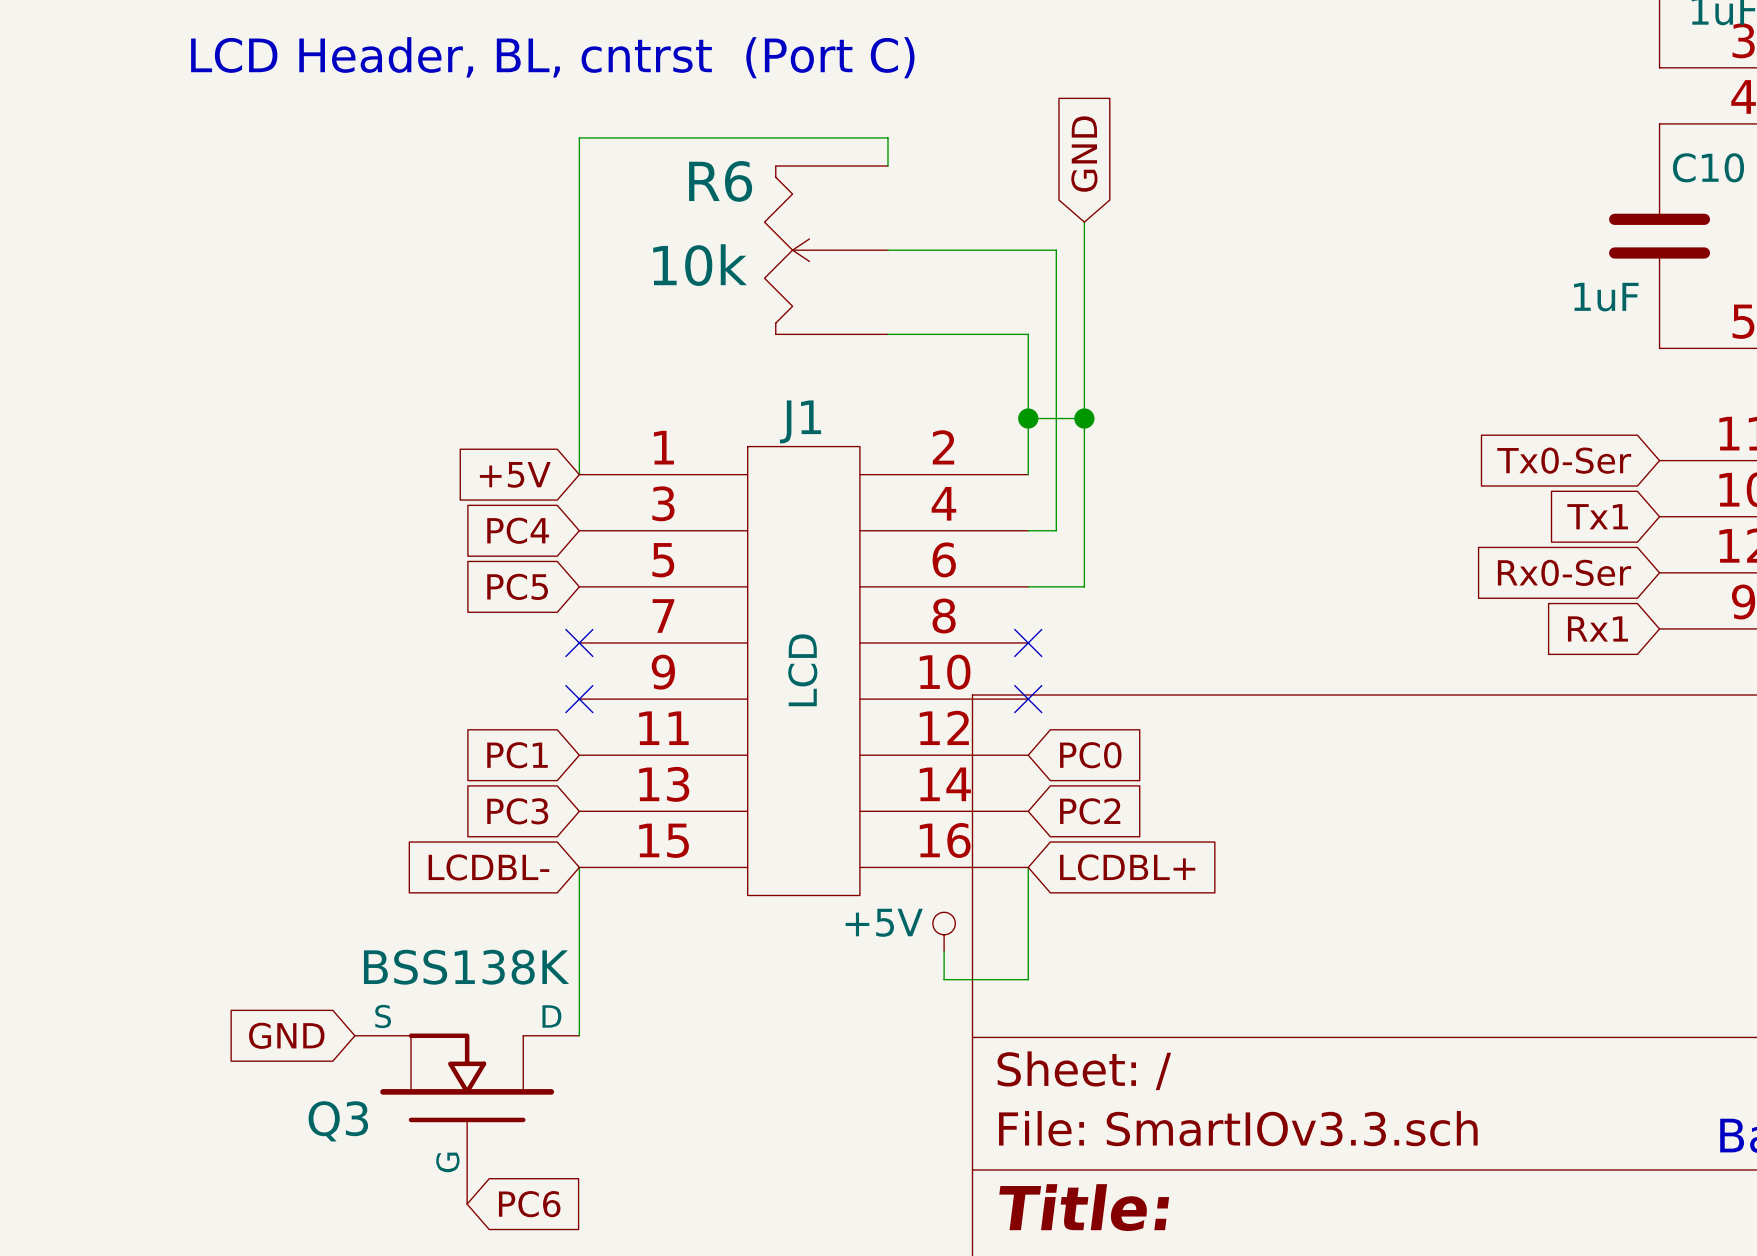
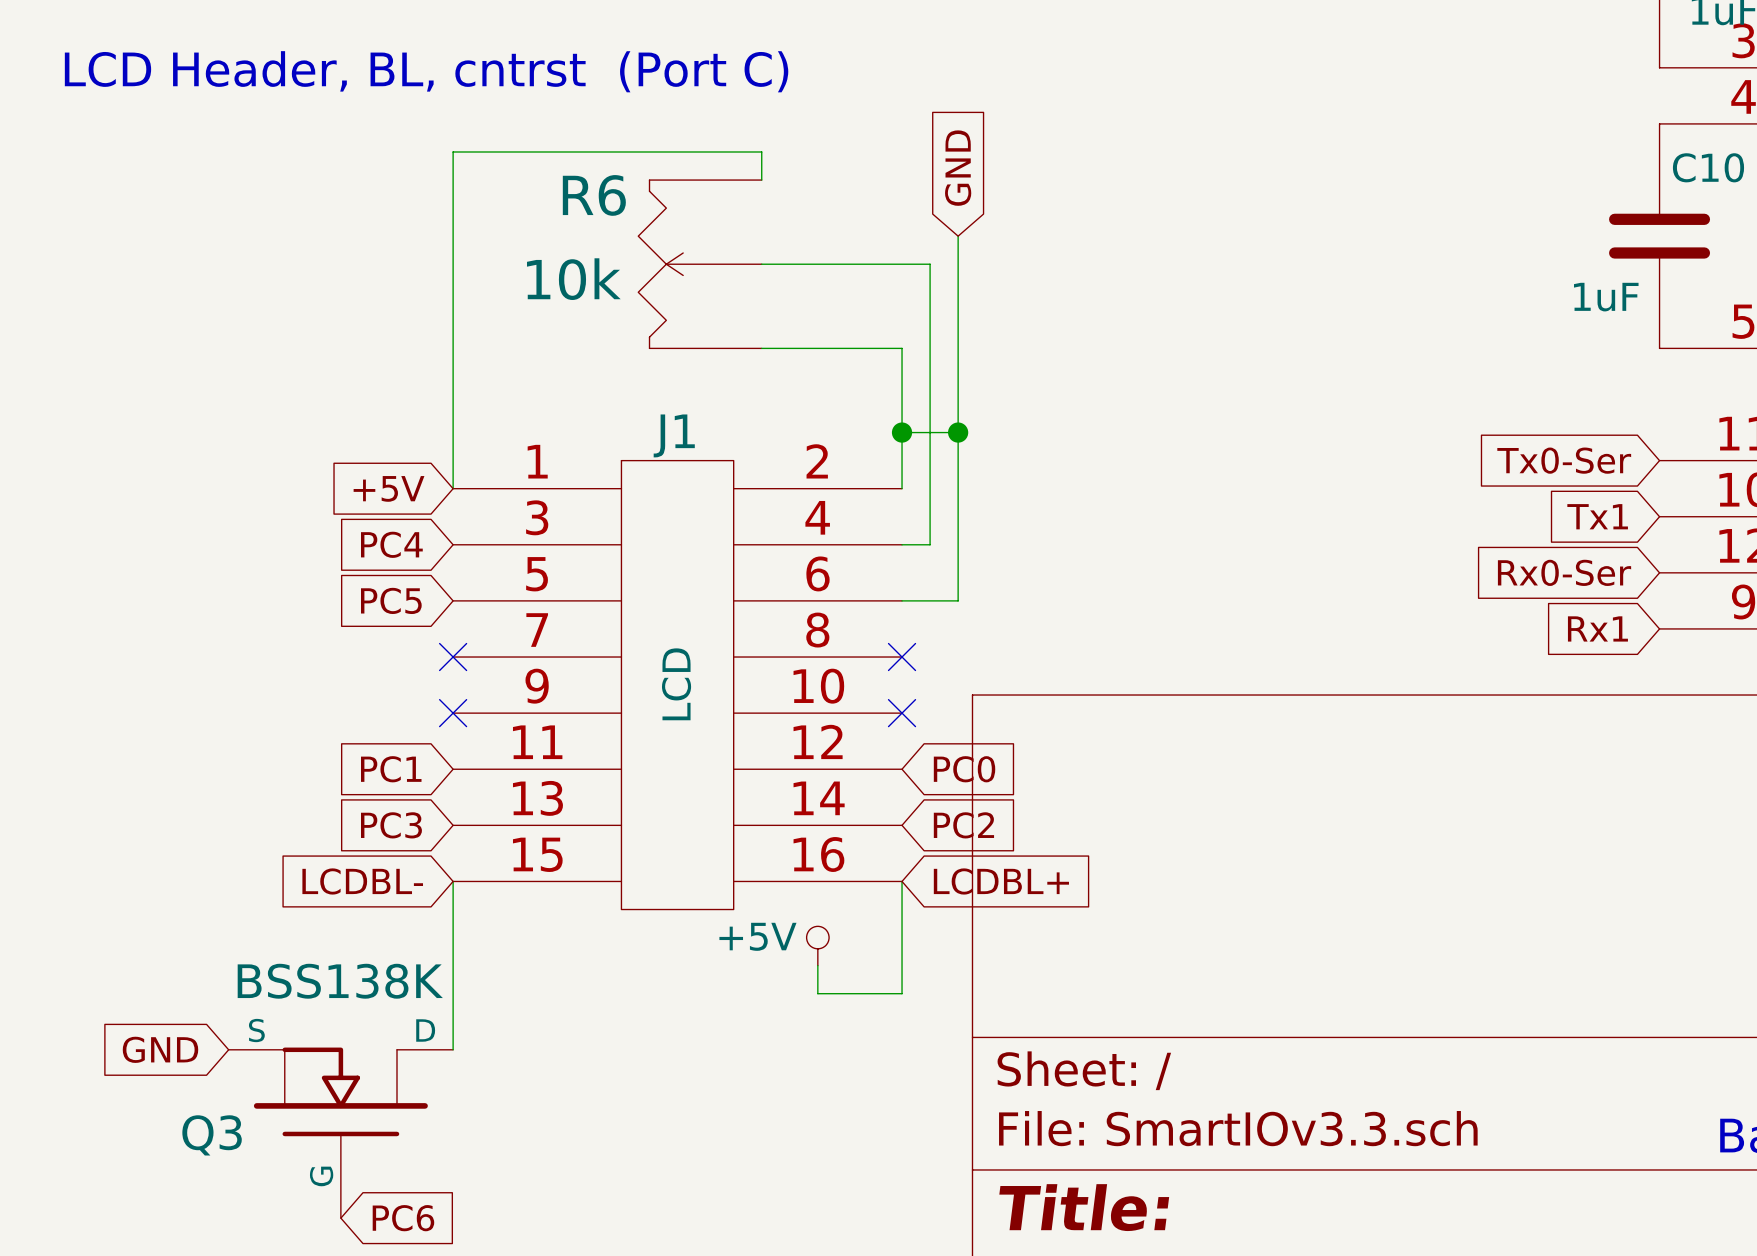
text position: LCD Header, BL, cntrst (Port C) (552, 57) -> LCD Header, BL, cntrst (Port C) (426, 71)
global label position: GND (1084, 154) -> GND (958, 168)
wire: (887, 166) (887, 137) (579, 137) (579, 474) -> (761, 180) (761, 151) (453, 151) (453, 488)
wire: (1084, 222) (1084, 586) (1028, 586) -> (958, 236) (958, 600) (902, 600)
R6 position: (826, 250) -> (700, 264)
wire: (887, 250) (1056, 250) (1056, 530) (1028, 530) -> (761, 264) (930, 264) (930, 544) (902, 544)
wire: (887, 334) (1028, 334) (1028, 474) -> (761, 348) (902, 348) (902, 488)
wire: (1028, 418) (1084, 418) -> (902, 432) (958, 432)
junction: (1028, 418) -> none
junction: (1084, 418) -> none
junction: none -> (902, 432)
junction: none -> (958, 432)
global label position: +5V (515, 474) -> +5V (389, 488)
global label position: PC4 (518, 530) -> PC4 (391, 544)
global label position: PC5 (517, 586) -> PC5 (391, 600)
no-connect mark: (579, 642) -> none
no-connect mark: (1028, 642) -> none
no-connect mark: none -> (453, 657)
no-connect mark: none -> (902, 657)
J1 position: (803, 671) -> (677, 685)
no-connect mark: (579, 699) -> none
no-connect mark: (1028, 699) -> none
no-connect mark: none -> (453, 713)
no-connect mark: none -> (902, 713)
global label position: PC1 (517, 755) -> PC1 (391, 769)
global label position: PC0 (1090, 755) -> PC0 (964, 769)
global label position: PC3 (517, 811) -> PC3 (391, 825)
global label position: PC2 (1090, 811) -> PC2 (963, 825)
global label position: LCDBL- (488, 867) -> LCDBL- (362, 881)
wire: (579, 867) (579, 1035) -> (453, 881) (453, 1049)
wire: (1028, 867) (1028, 979) (944, 979) (944, 951) -> (902, 881) (902, 993) (817, 993) (817, 965)
global label position: LCDBL+ (1127, 867) -> LCDBL+ (1001, 881)
power symbol position: +5V (944, 931) -> +5V (817, 945)
global label position: GND (286, 1035) -> GND (160, 1049)
Q3 position: (467, 1118) -> (340, 1132)
global label position: PC6 (529, 1204) -> PC6 (403, 1218)

